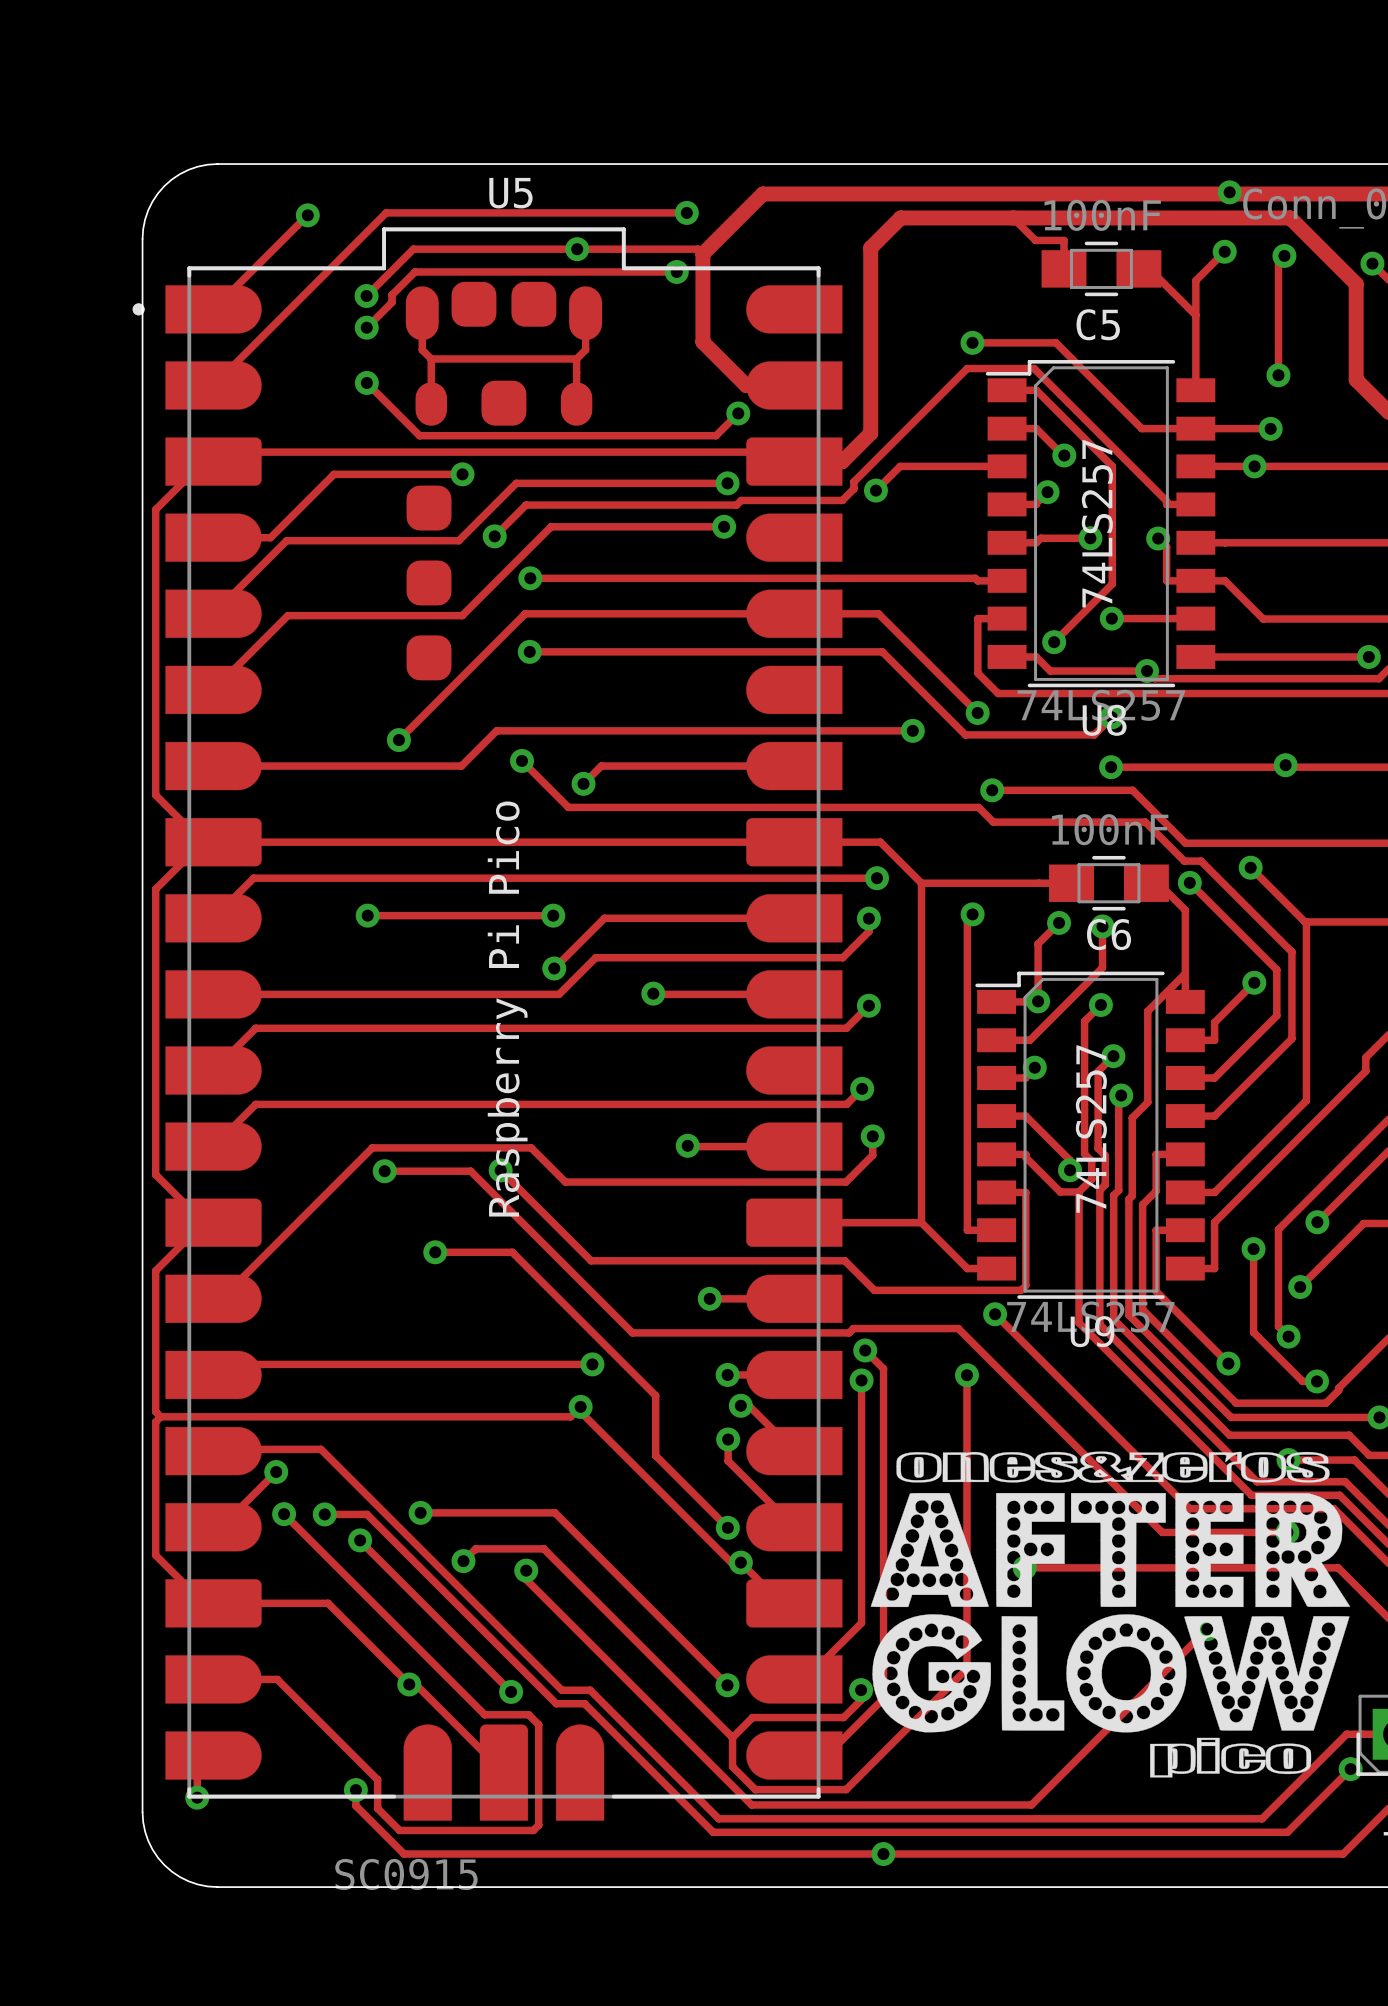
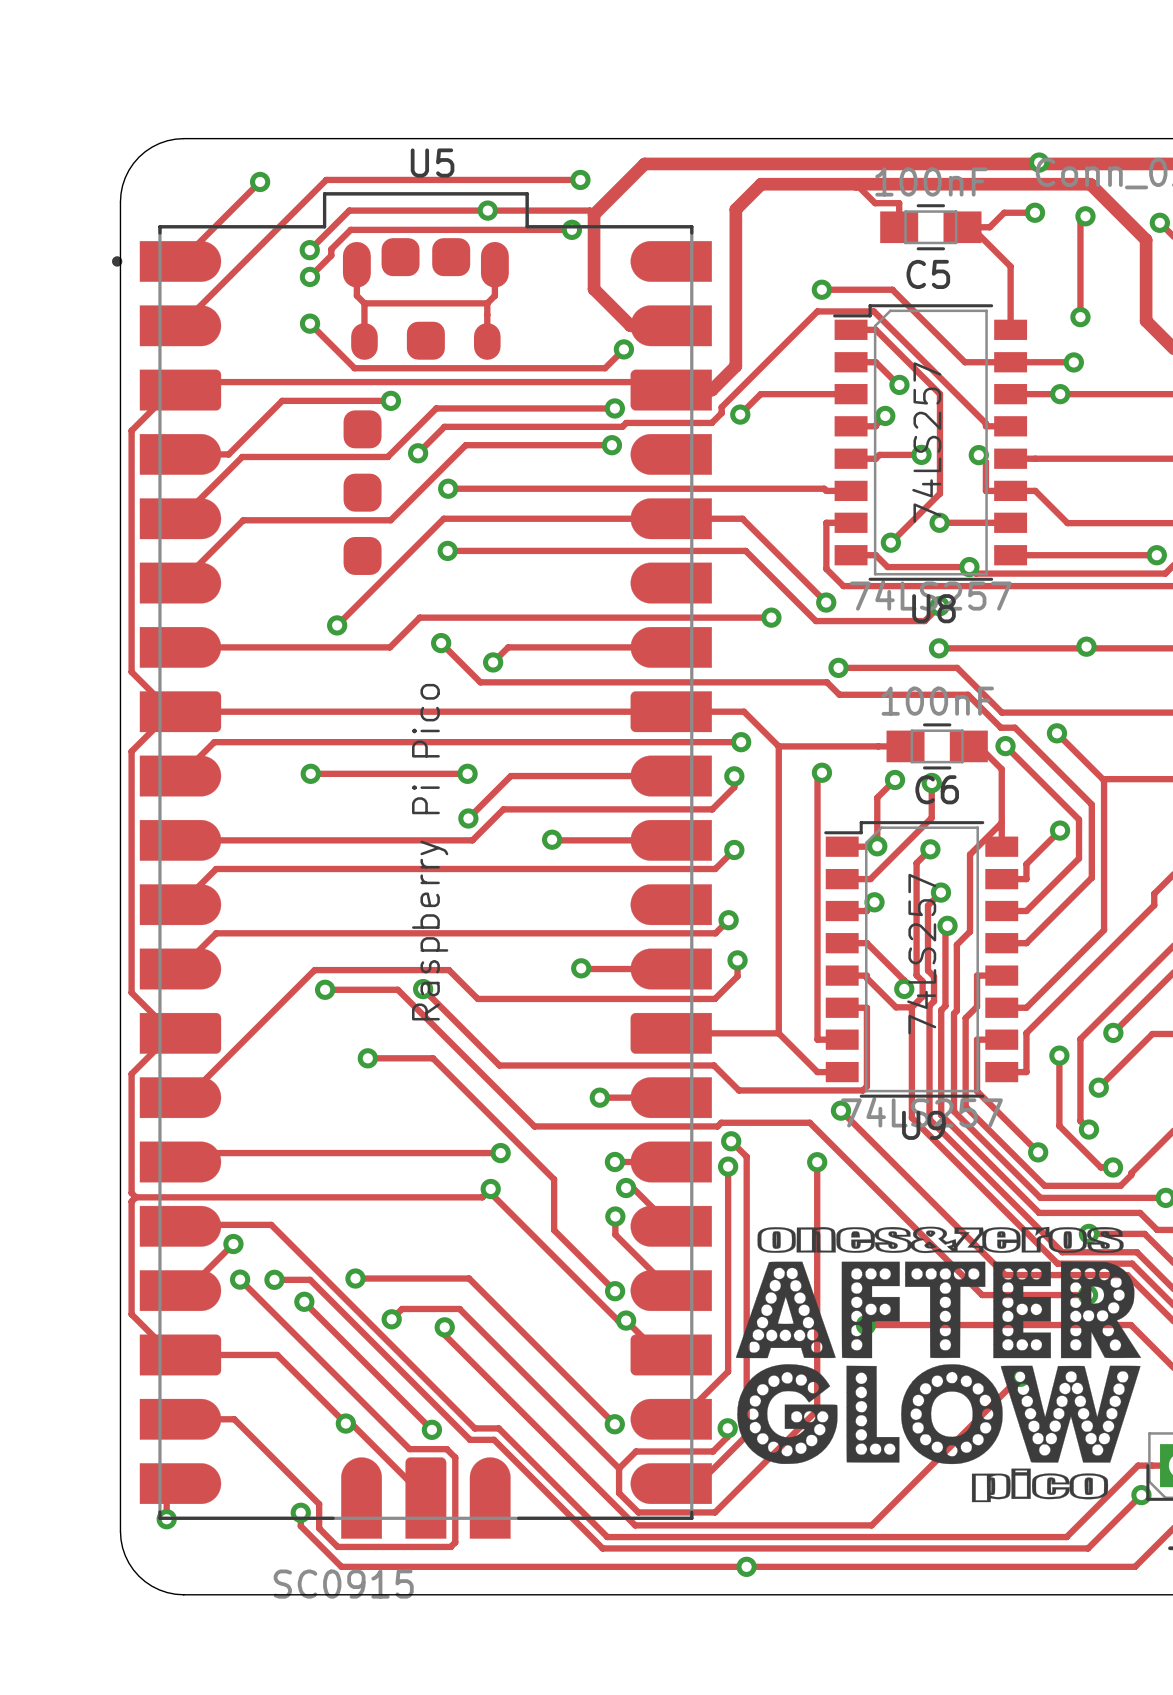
track: (1224, 251) (1195, 280) (1195, 315) -> (1035, 212) (1004, 212) (989, 227) (971, 227)

